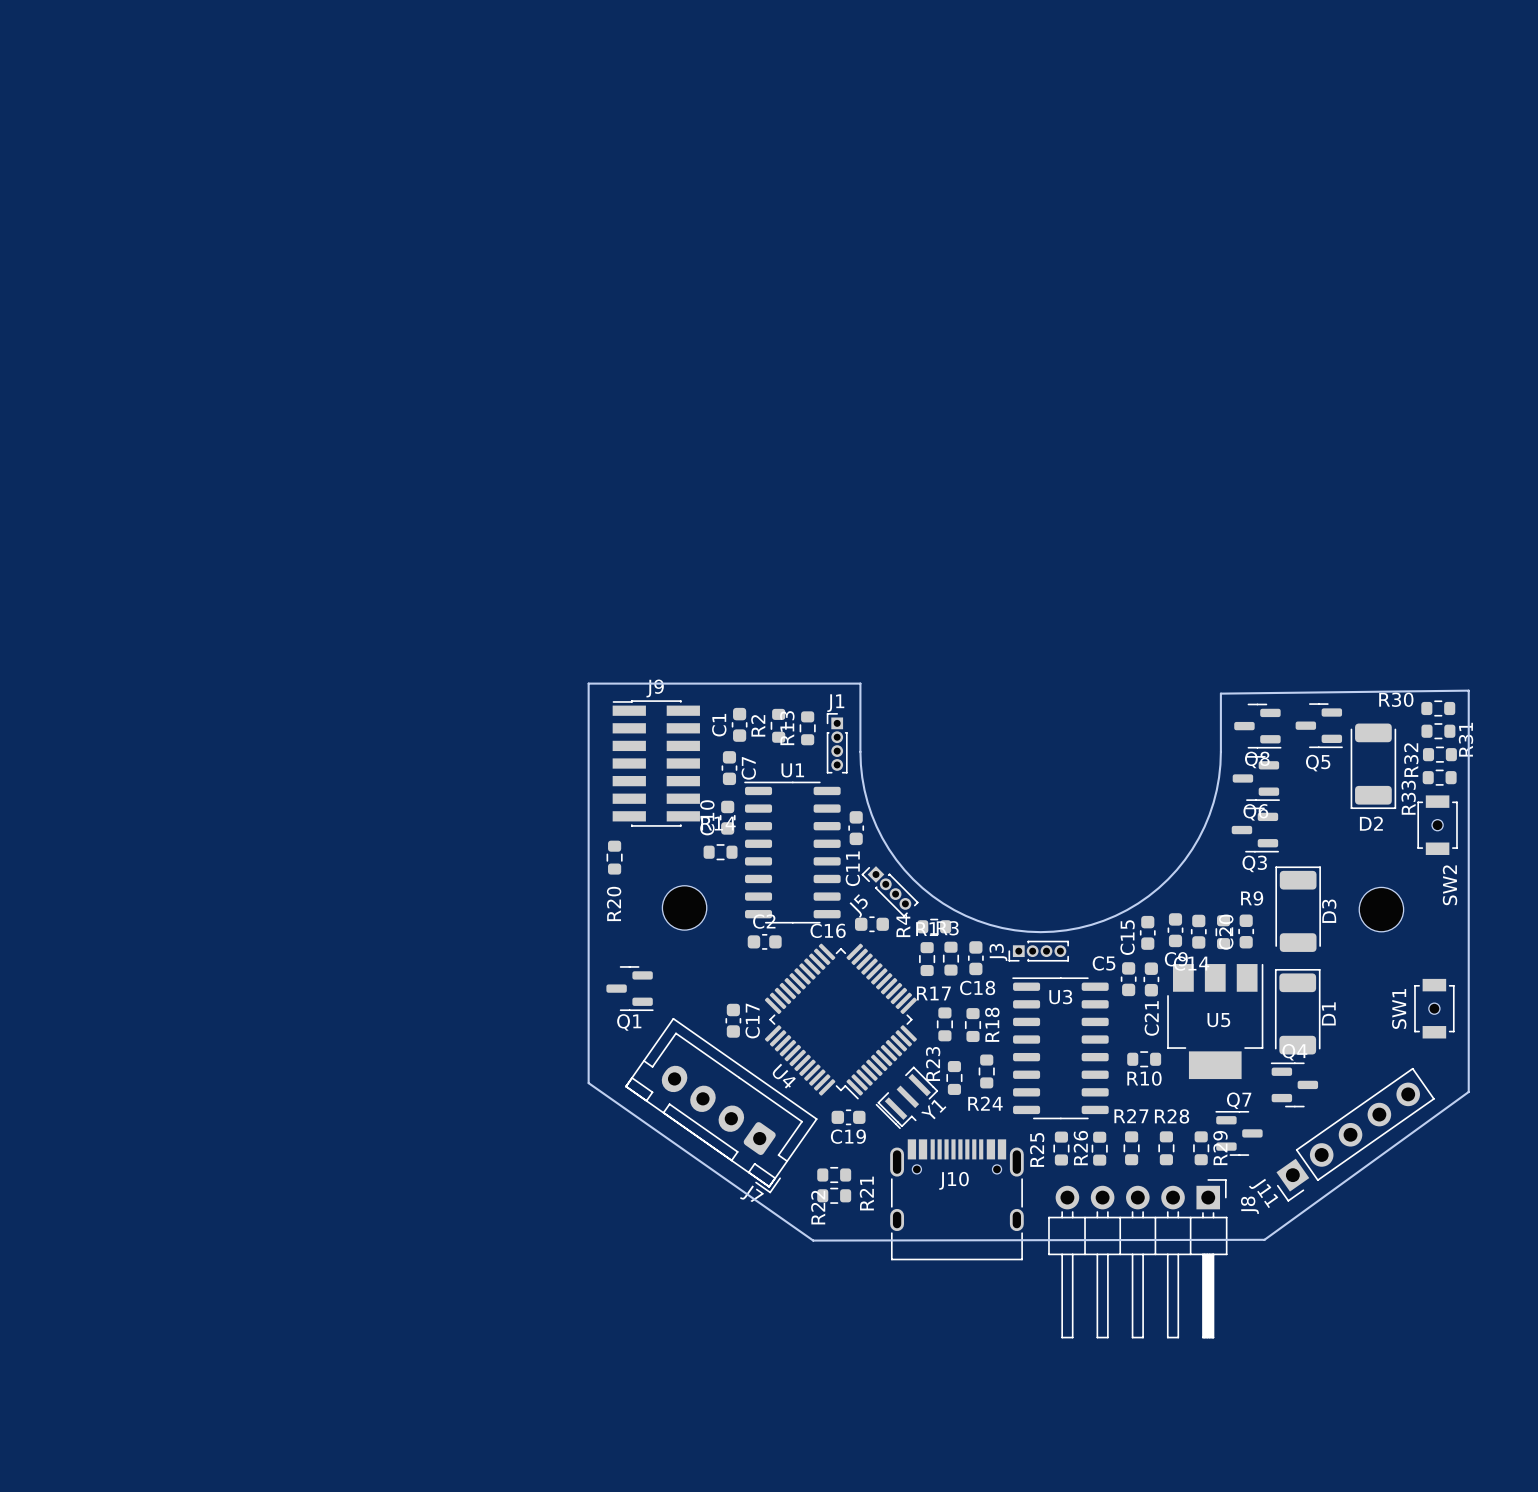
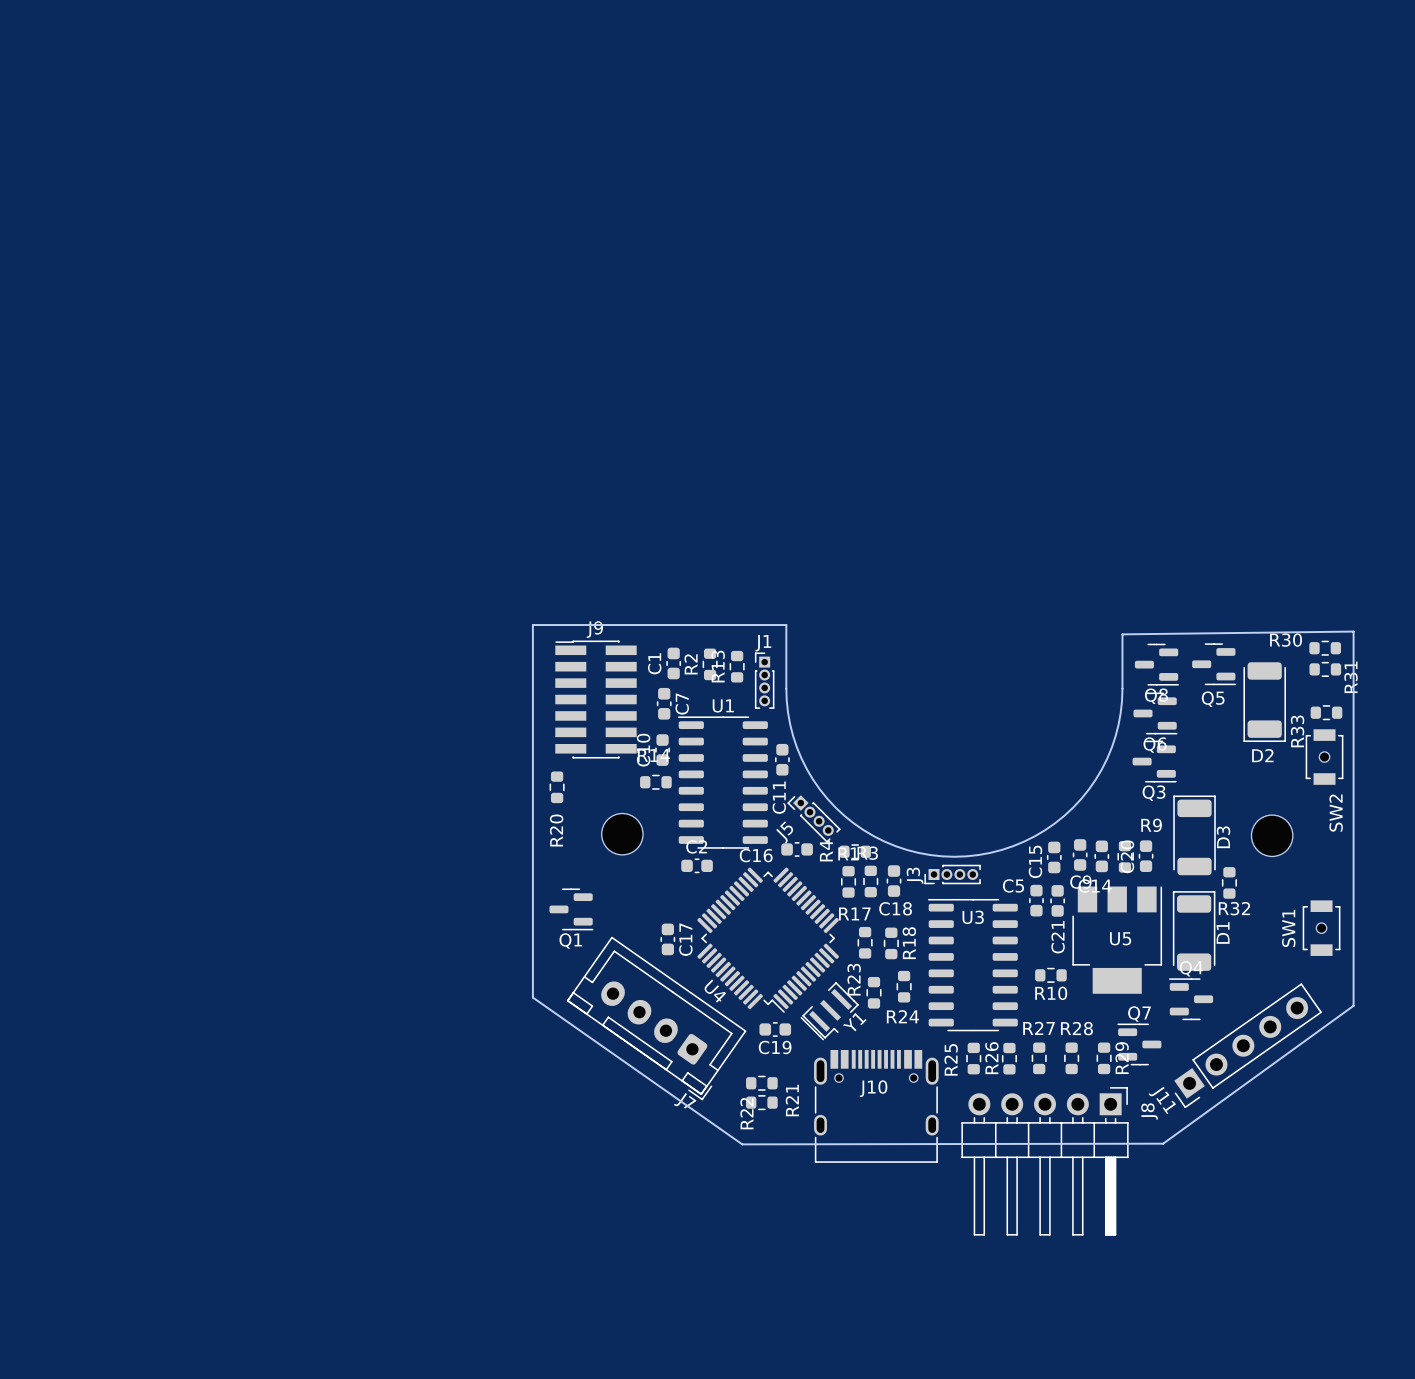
R32 rotation: 0° (1439, 754) -> 90° clockwise (1229, 882)
R32 position: (1439, 754) -> (1229, 882)
R32 name position: R32 (1411, 760) -> R32 (1234, 908)

